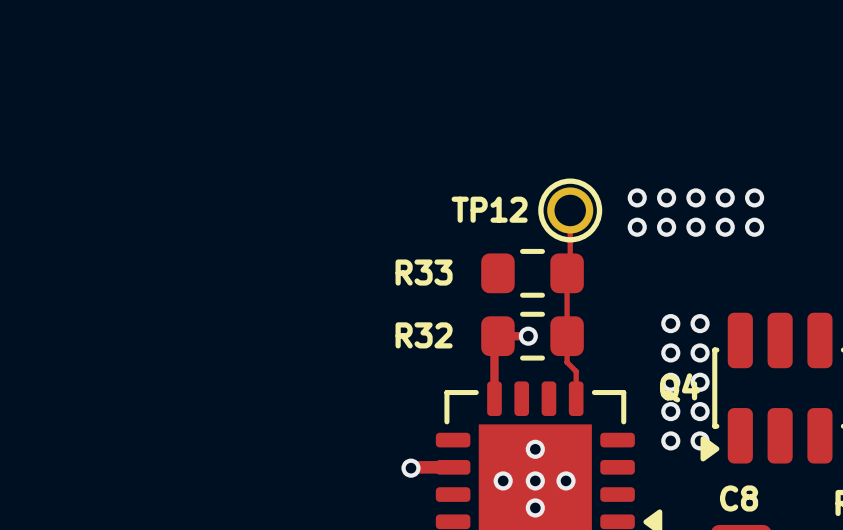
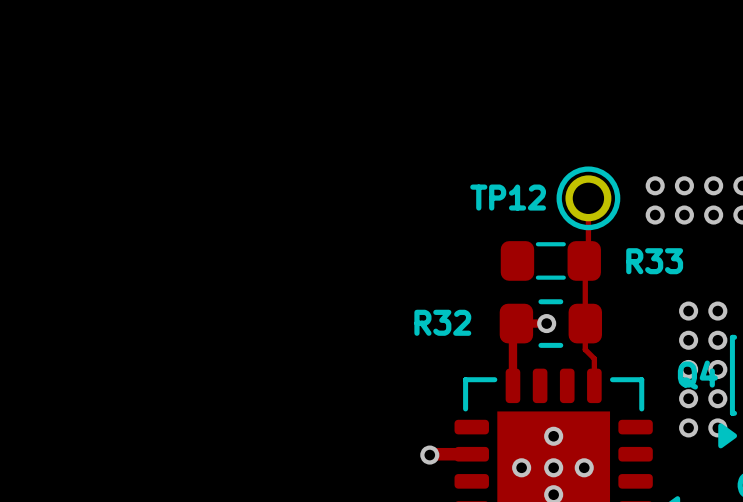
R33 footprint: [481, 248, 584, 298] -> [500, 241, 601, 281]
R33 name position: R33 (424, 272) -> R33 (654, 261)

